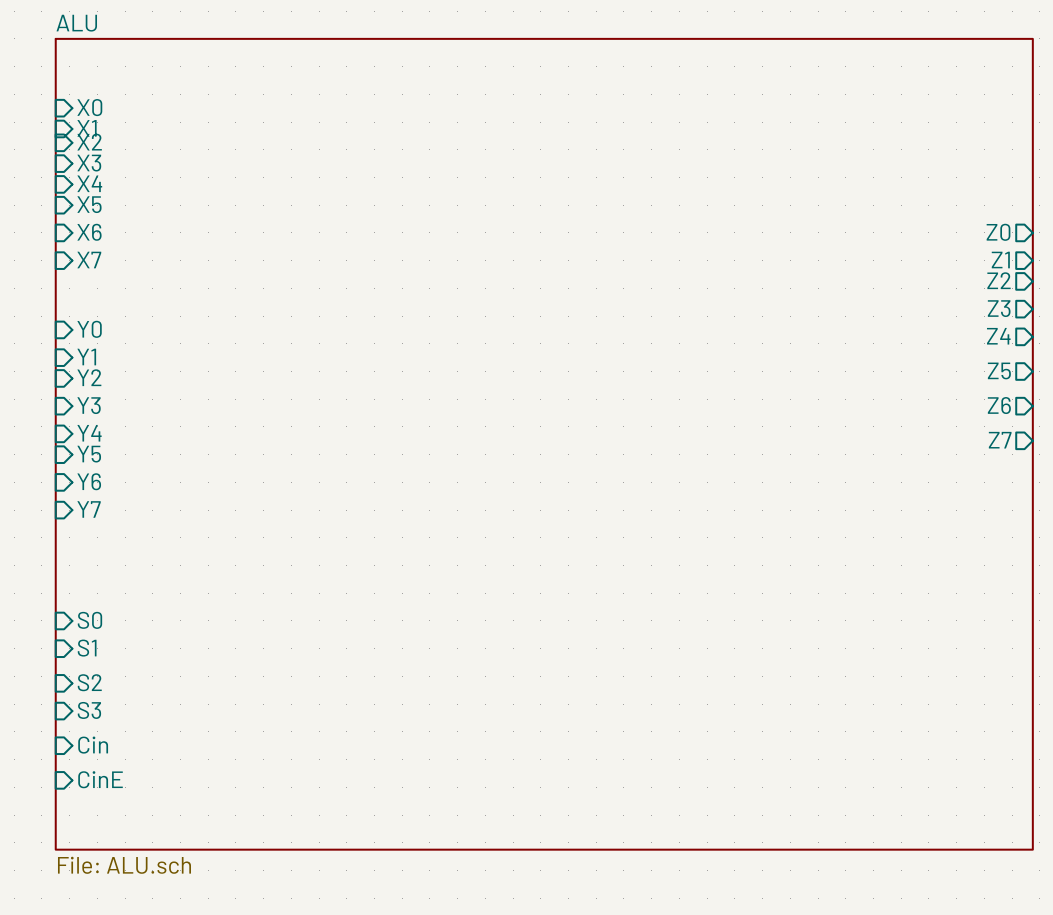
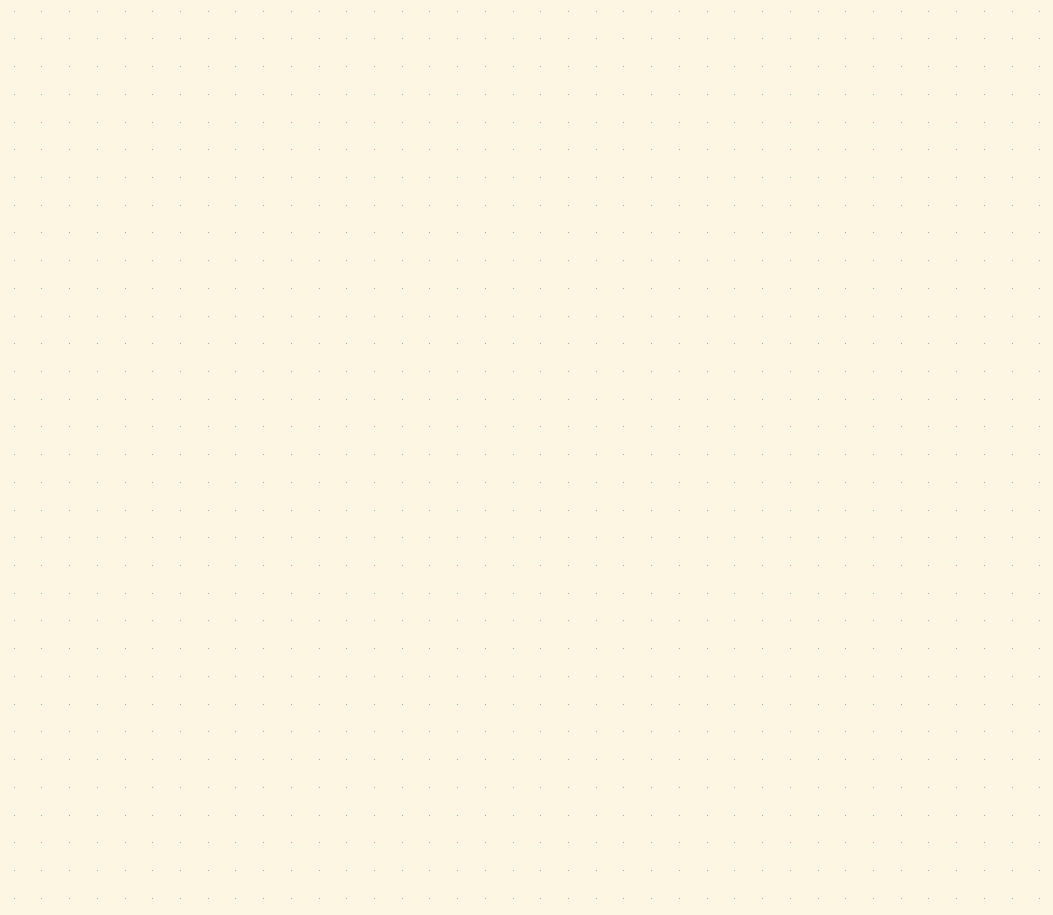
sheet pin: X0 (89, 107) -> none
sheet pin: X1 (87, 128) -> none
sheet pin: X2 (89, 142) -> none
sheet pin: X3 (89, 163) -> none
sheet pin: X4 (89, 183) -> none
sheet pin: X5 (89, 204) -> none
sheet pin: X6 (89, 232) -> none
sheet pin: Z0 (998, 232) -> none
sheet pin: X7 (89, 260) -> none
sheet pin: Z1 (1000, 260) -> none
sheet pin: Z2 (999, 280) -> none
sheet pin: Z3 (999, 308) -> none
sheet pin: Y0 (89, 329) -> none
sheet pin: Z4 (998, 336) -> none
sheet pin: Y1 (86, 357) -> none
sheet pin: Z5 (999, 370) -> none
sheet pin: Y2 (89, 377) -> none
sheet pin: Y3 (89, 405) -> none
sheet pin: Z6 (999, 405) -> none
sheet pin: Y4 (89, 433) -> none
sheet pin: Z7 (1000, 440) -> none
sheet ALU: File: ALU.sch (544, 444) -> none
sheet pin: Y5 (89, 454) -> none
sheet pin: Y6 (89, 481) -> none
sheet pin: Y7 (89, 509) -> none
sheet pin: S0 (89, 620) -> none
sheet pin: S1 (87, 648) -> none
sheet pin: S2 (89, 682) -> none
sheet pin: S3 (89, 710) -> none
sheet pin: Cin (93, 745) -> none
sheet pin: CinE (100, 779) -> none

